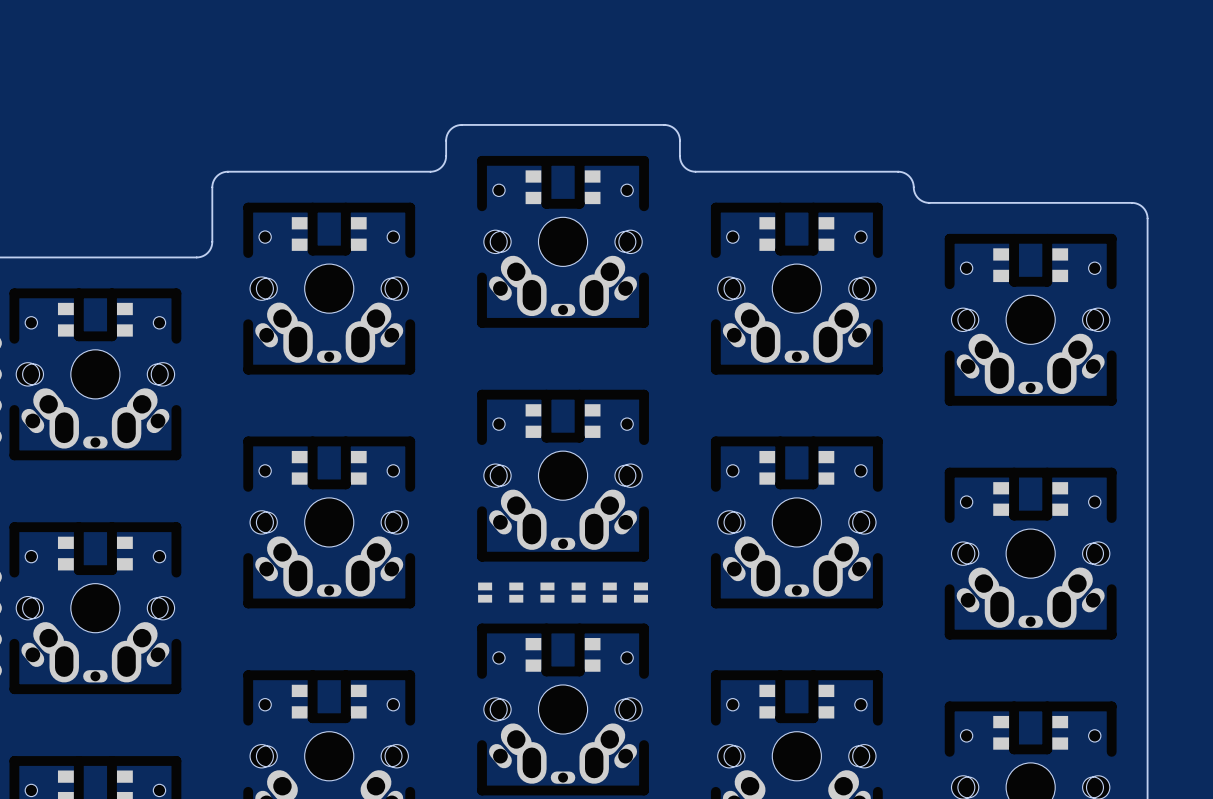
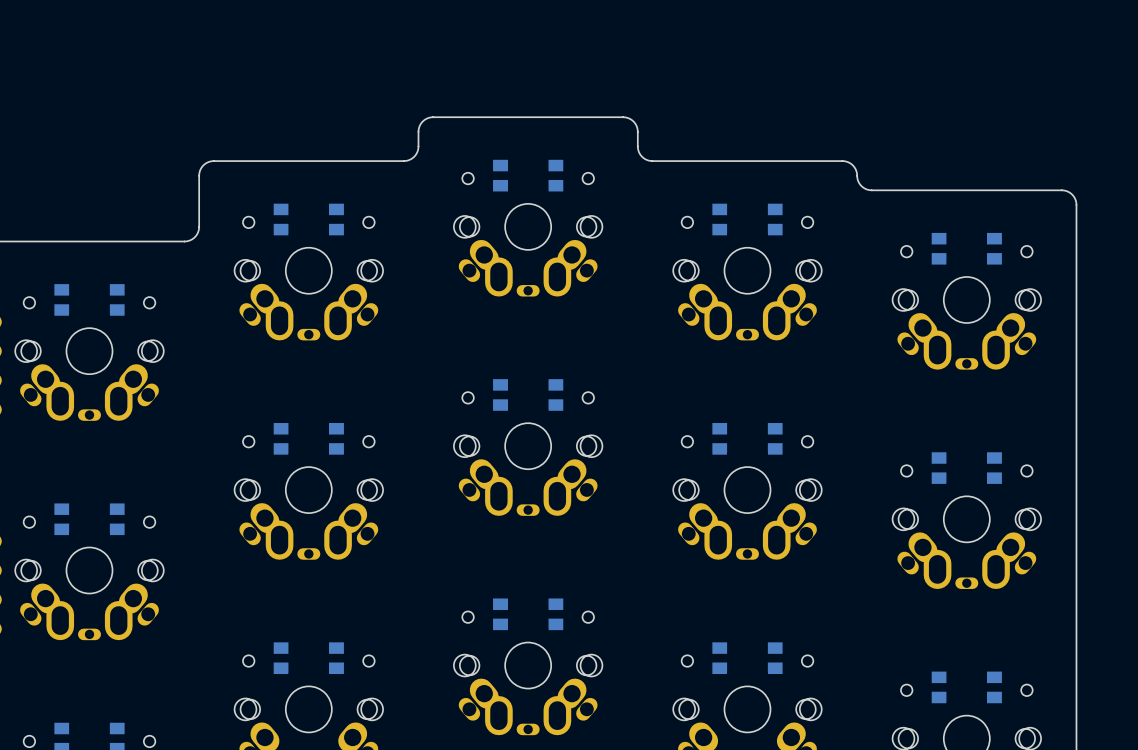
part: (485, 592) -> none
part: (516, 592) -> none
part: (547, 592) -> none
part: (578, 592) -> none
part: (609, 592) -> none
part: (640, 592) -> none

